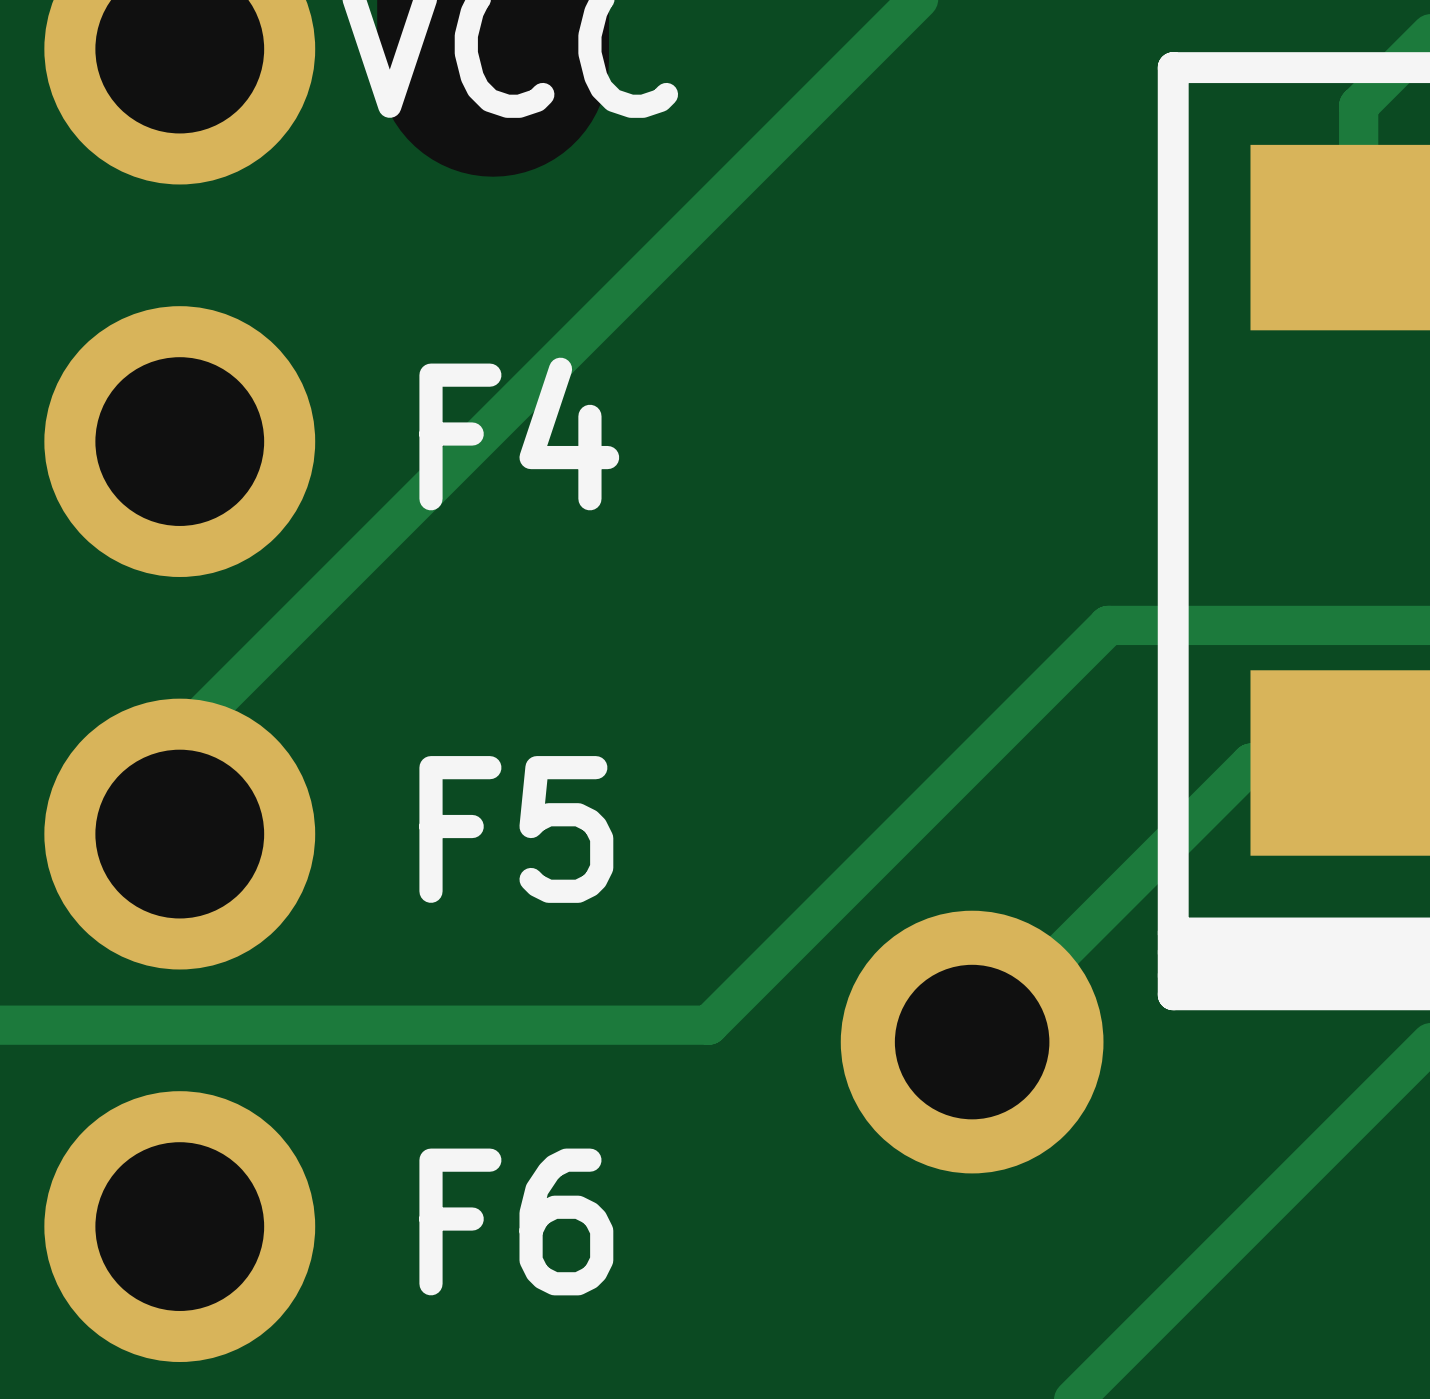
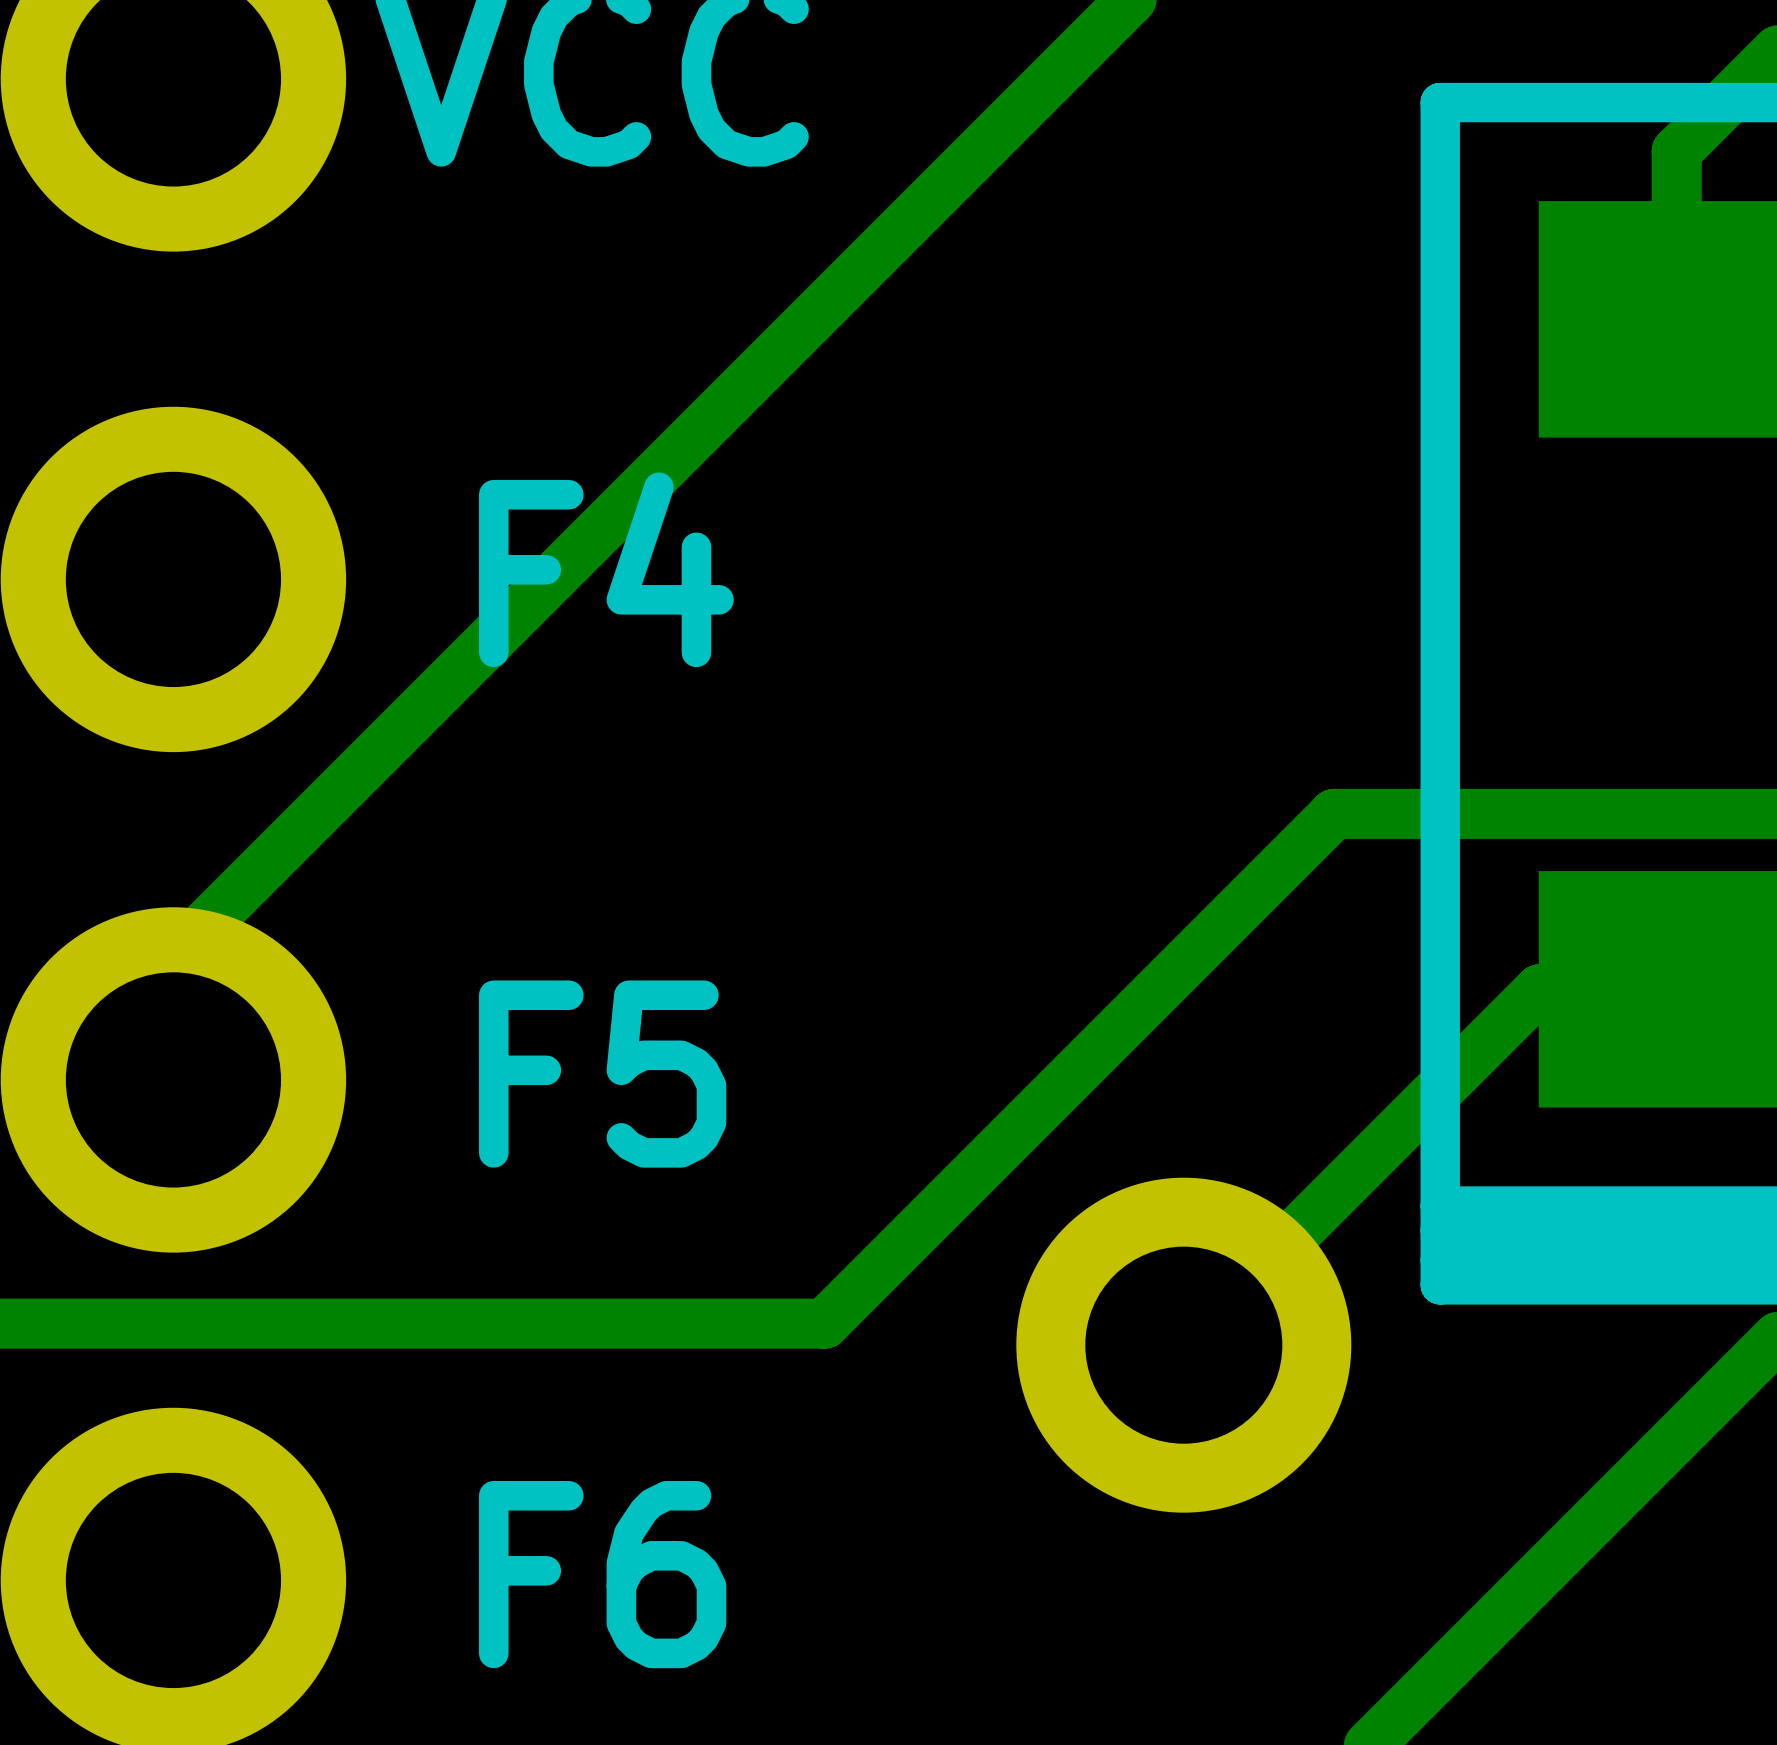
track: (1108, 625) (708, 1025) (690, 1025) -> (1357, 813) (1334, 813) (824, 1323)

